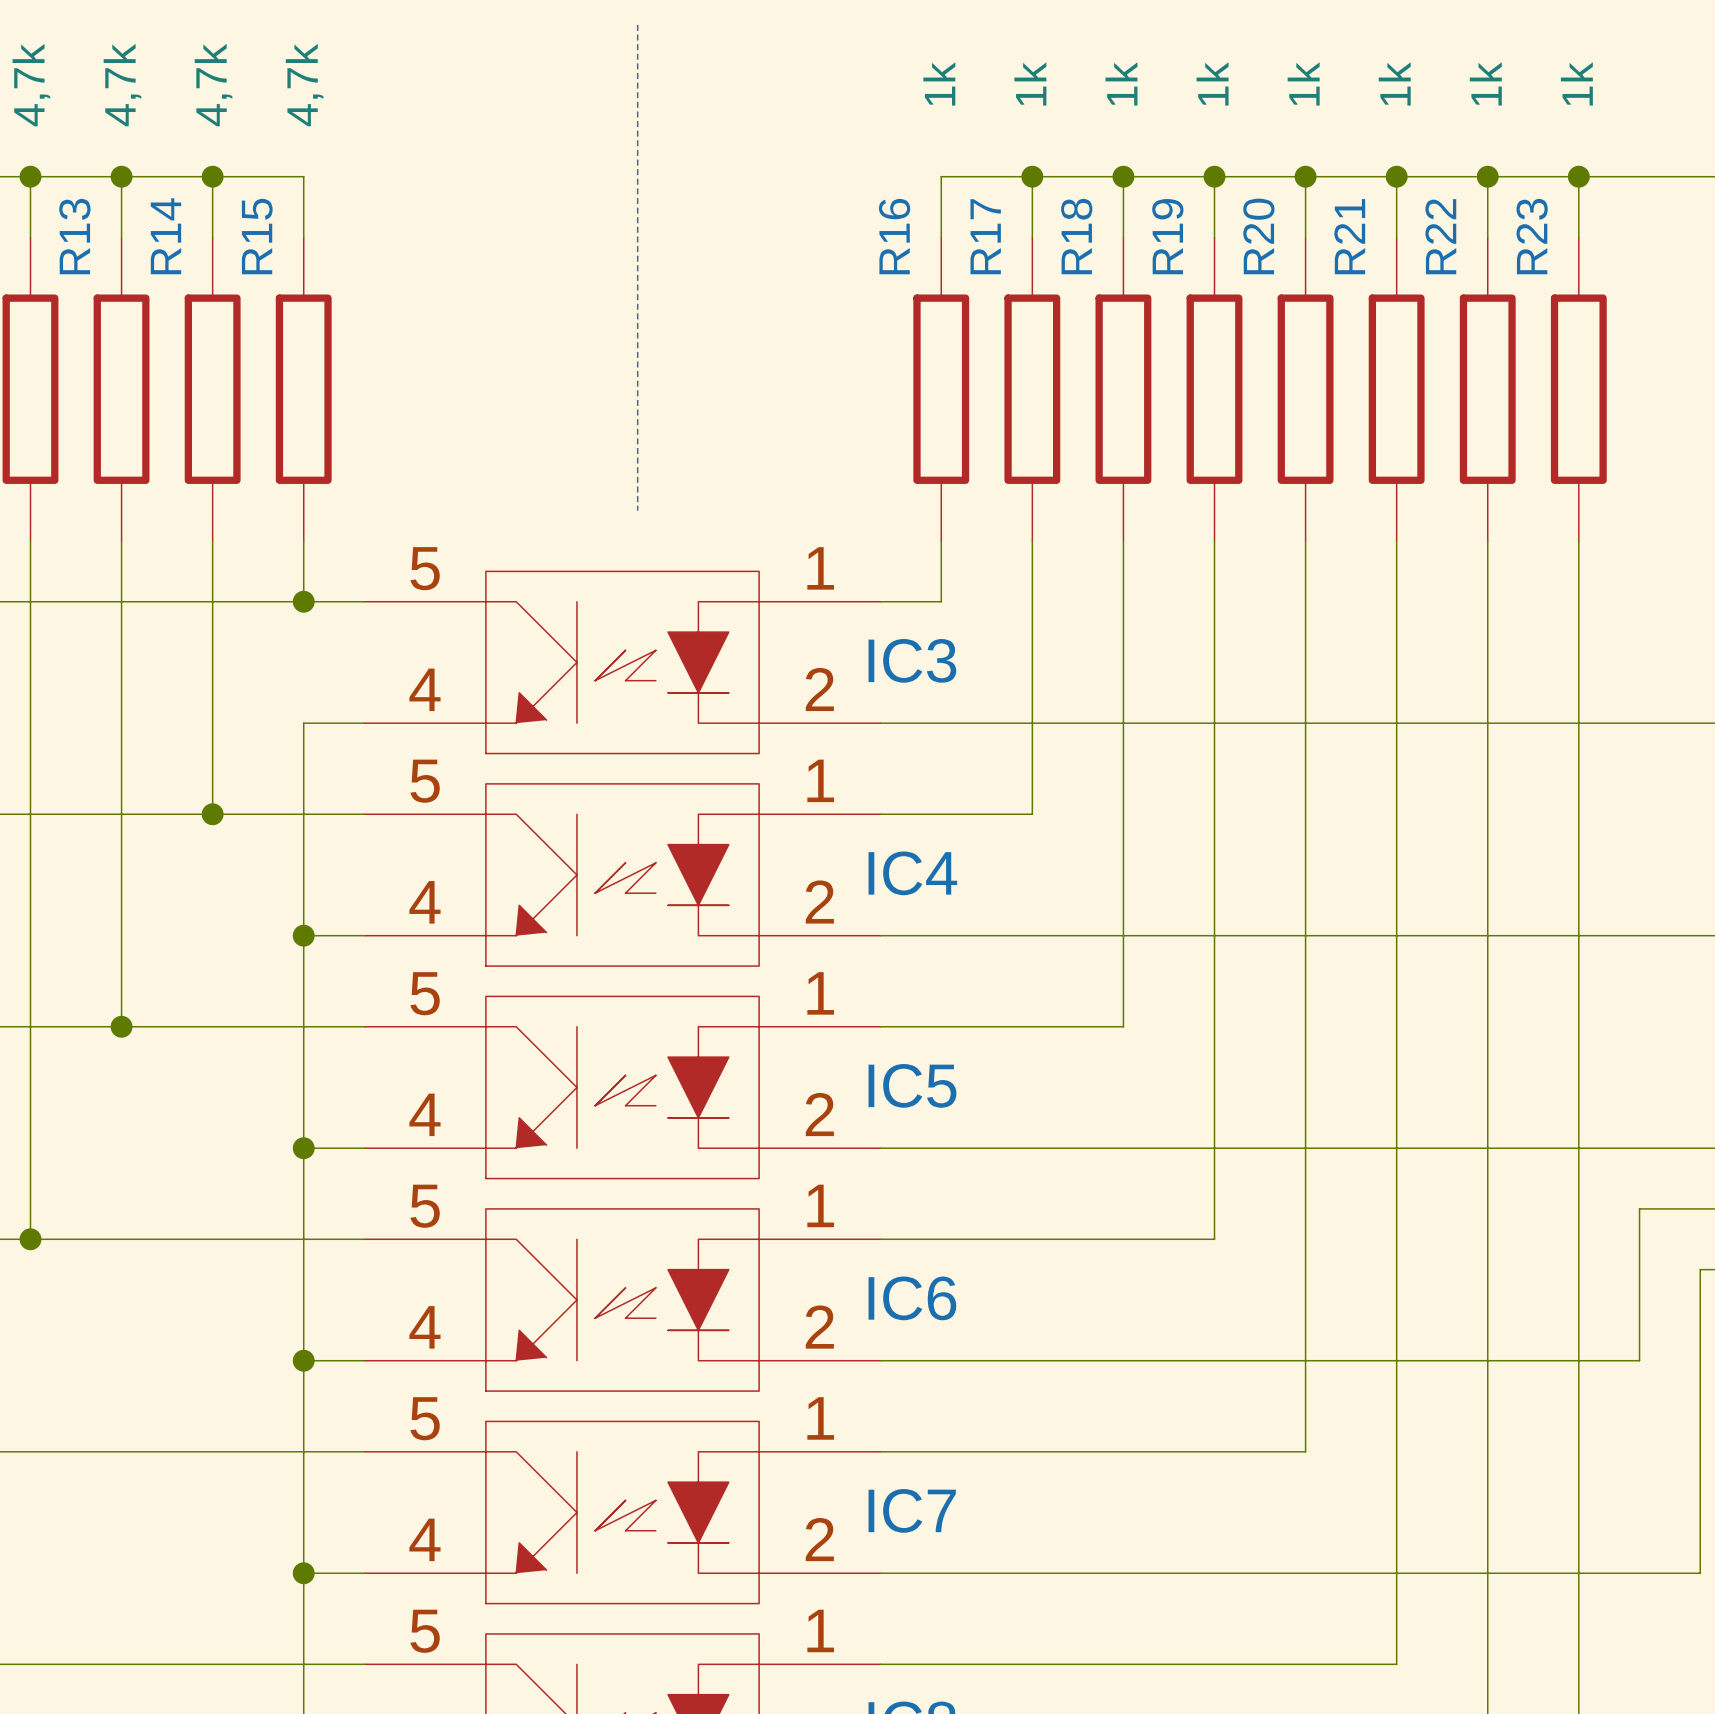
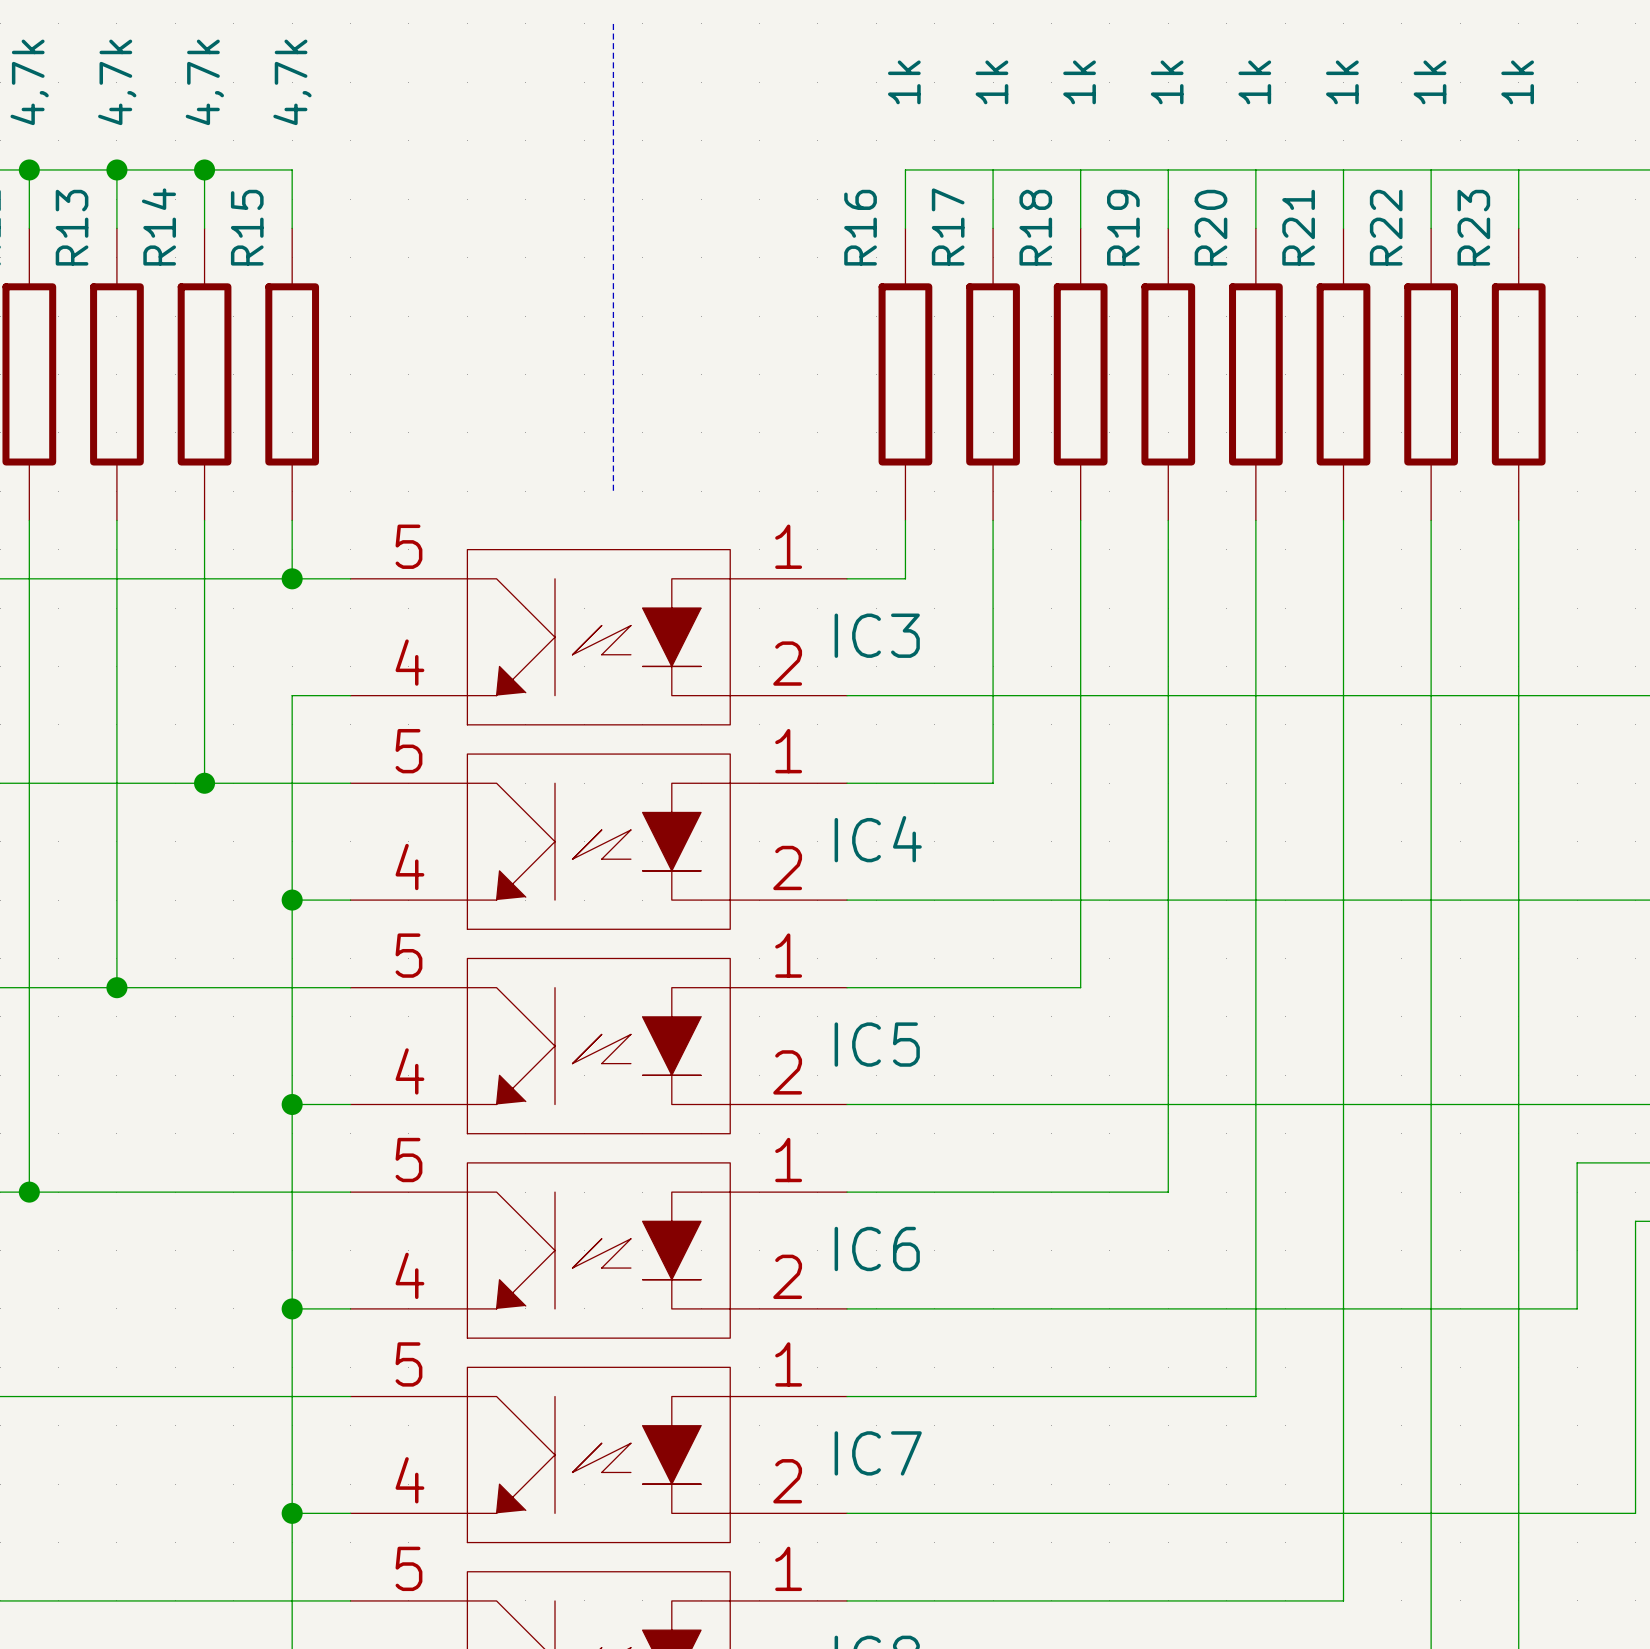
junction: (1032, 176) -> none
junction: (1123, 176) -> none
junction: (1214, 176) -> none
junction: (1305, 176) -> none
junction: (1396, 176) -> none
junction: (1487, 176) -> none
junction: (1578, 176) -> none

